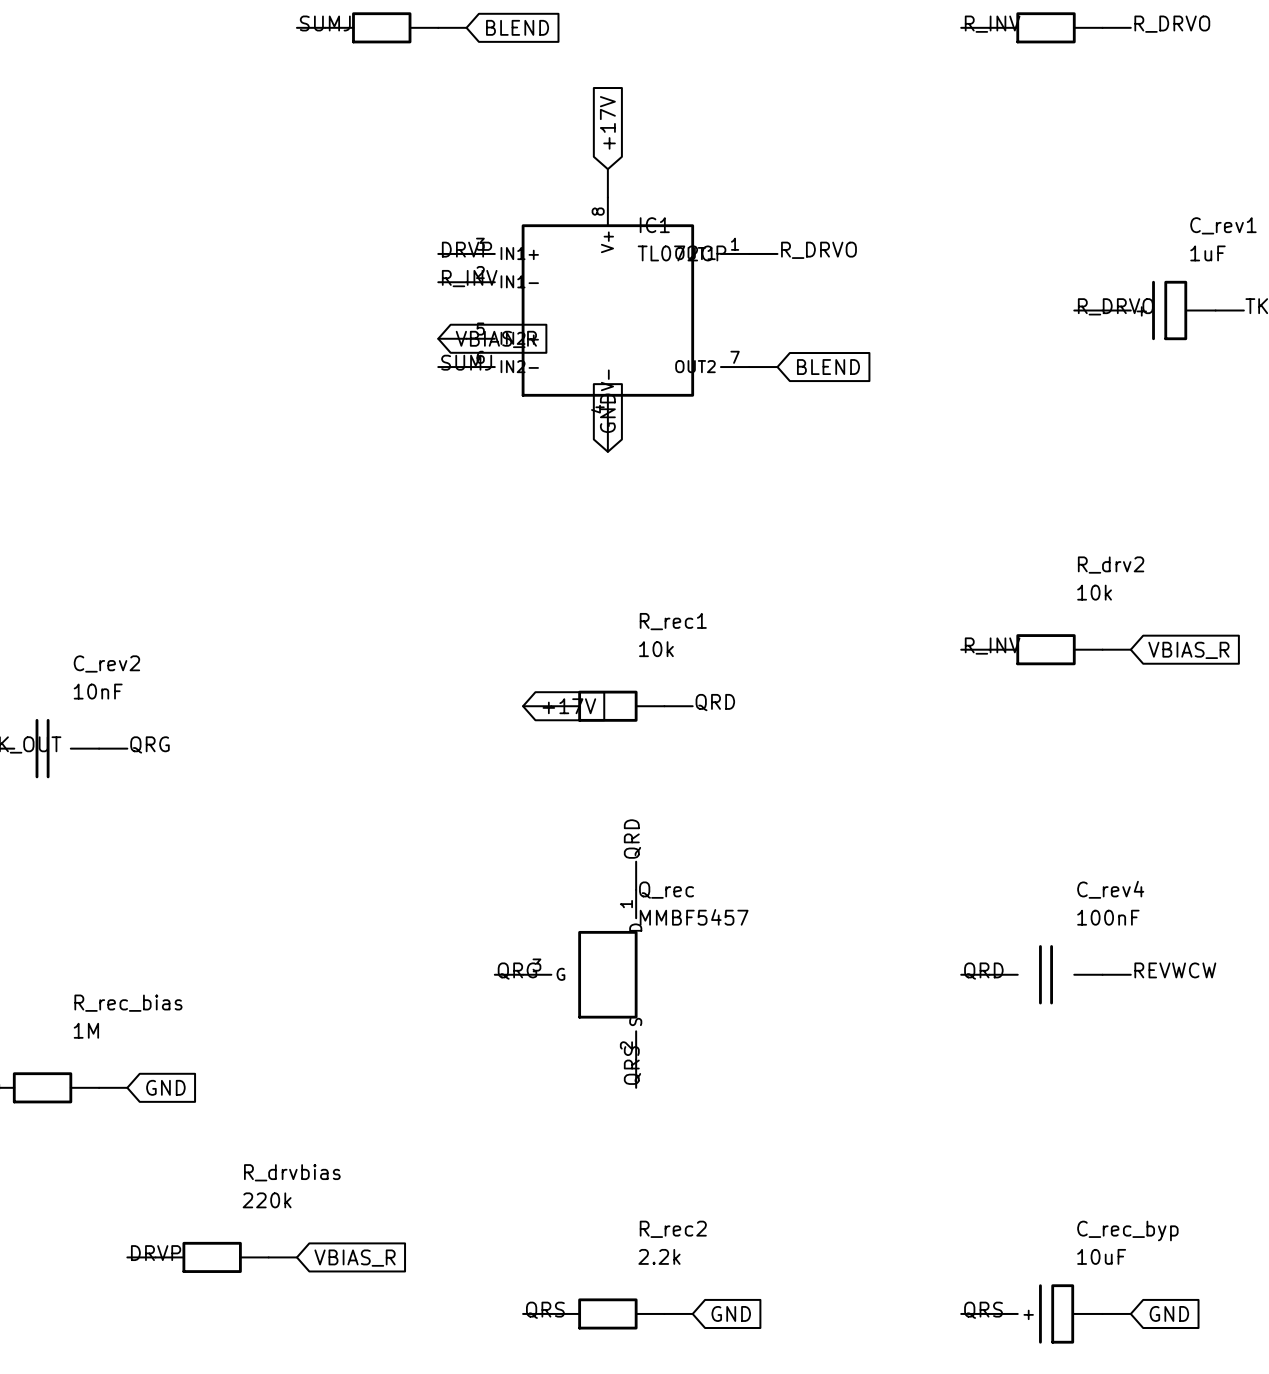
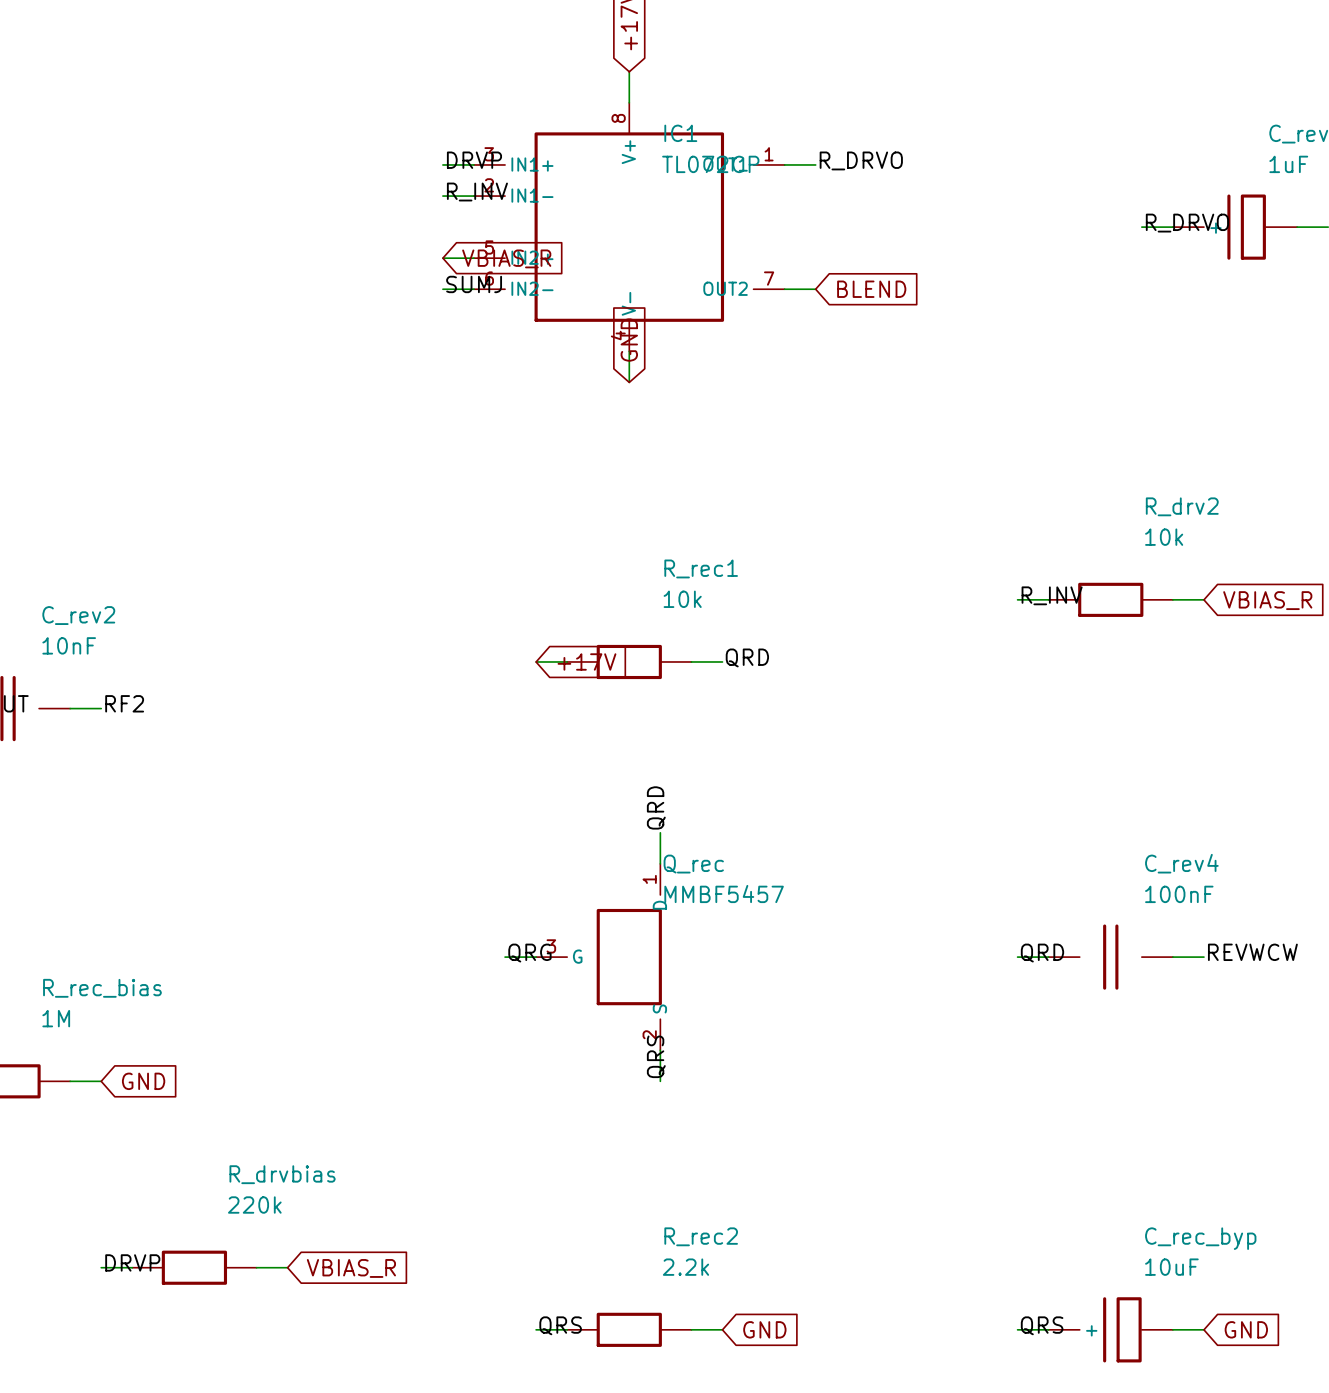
label: QRG (150, 744) -> RF2 (124, 703)

